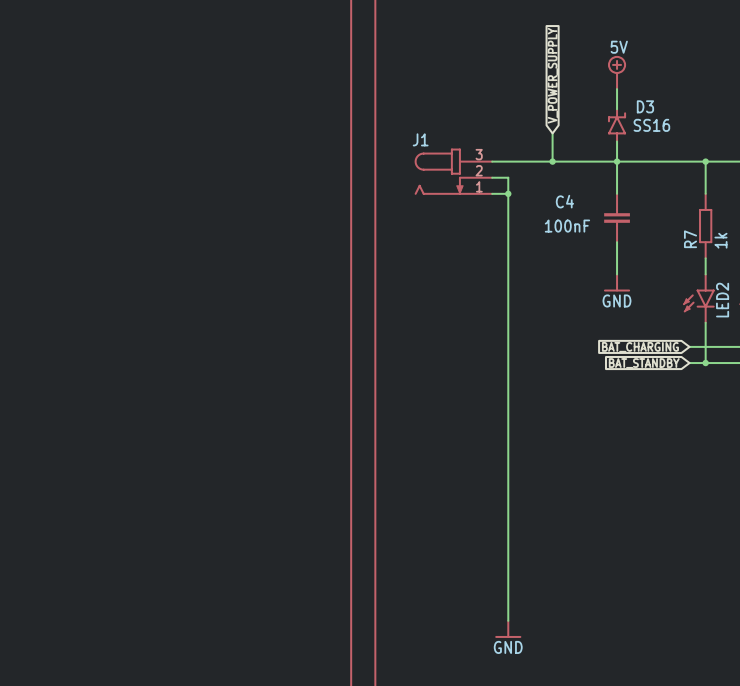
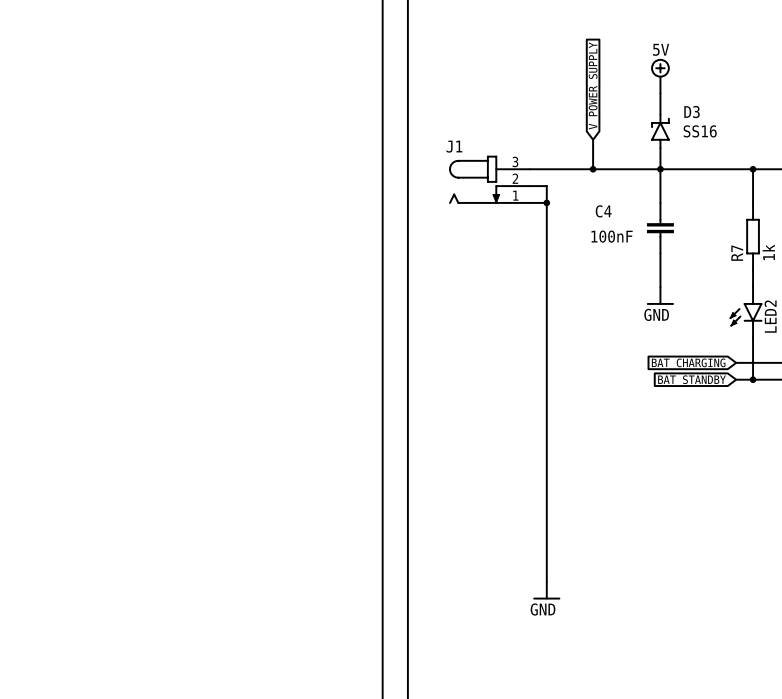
wire: (508, 556) (508, 620) -> none
power symbol position: GND (508, 629) -> GND (546, 590)

